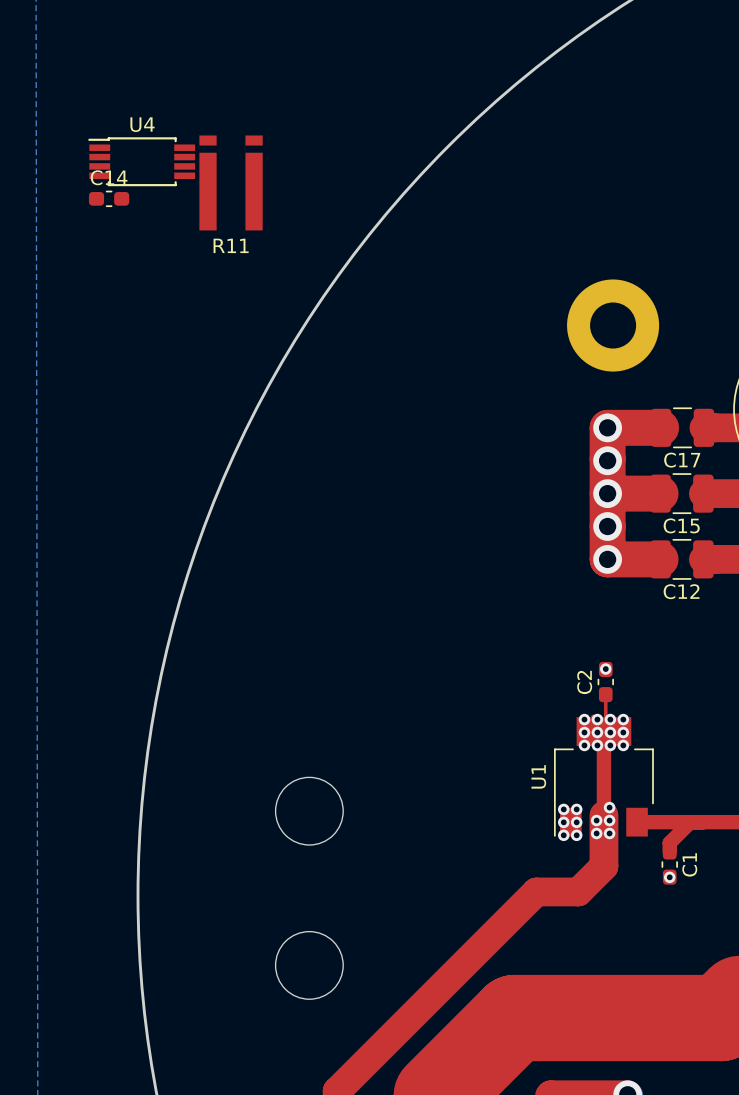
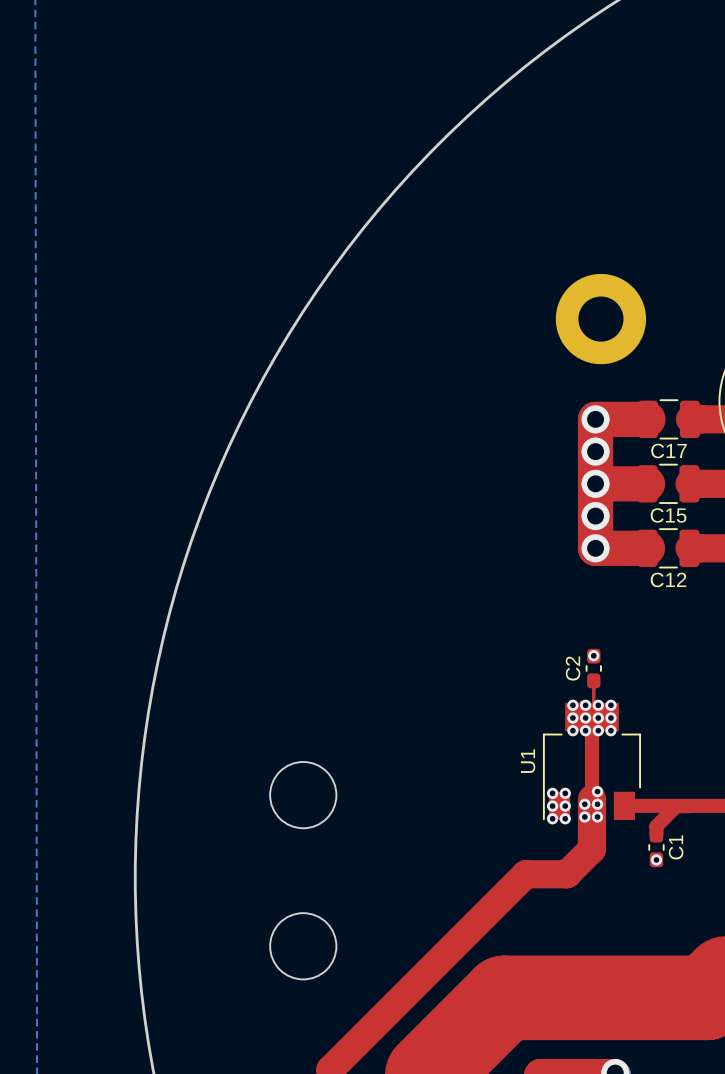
U4: (141, 161) -> none
R11: (231, 182) -> none
C14: (109, 198) -> none

